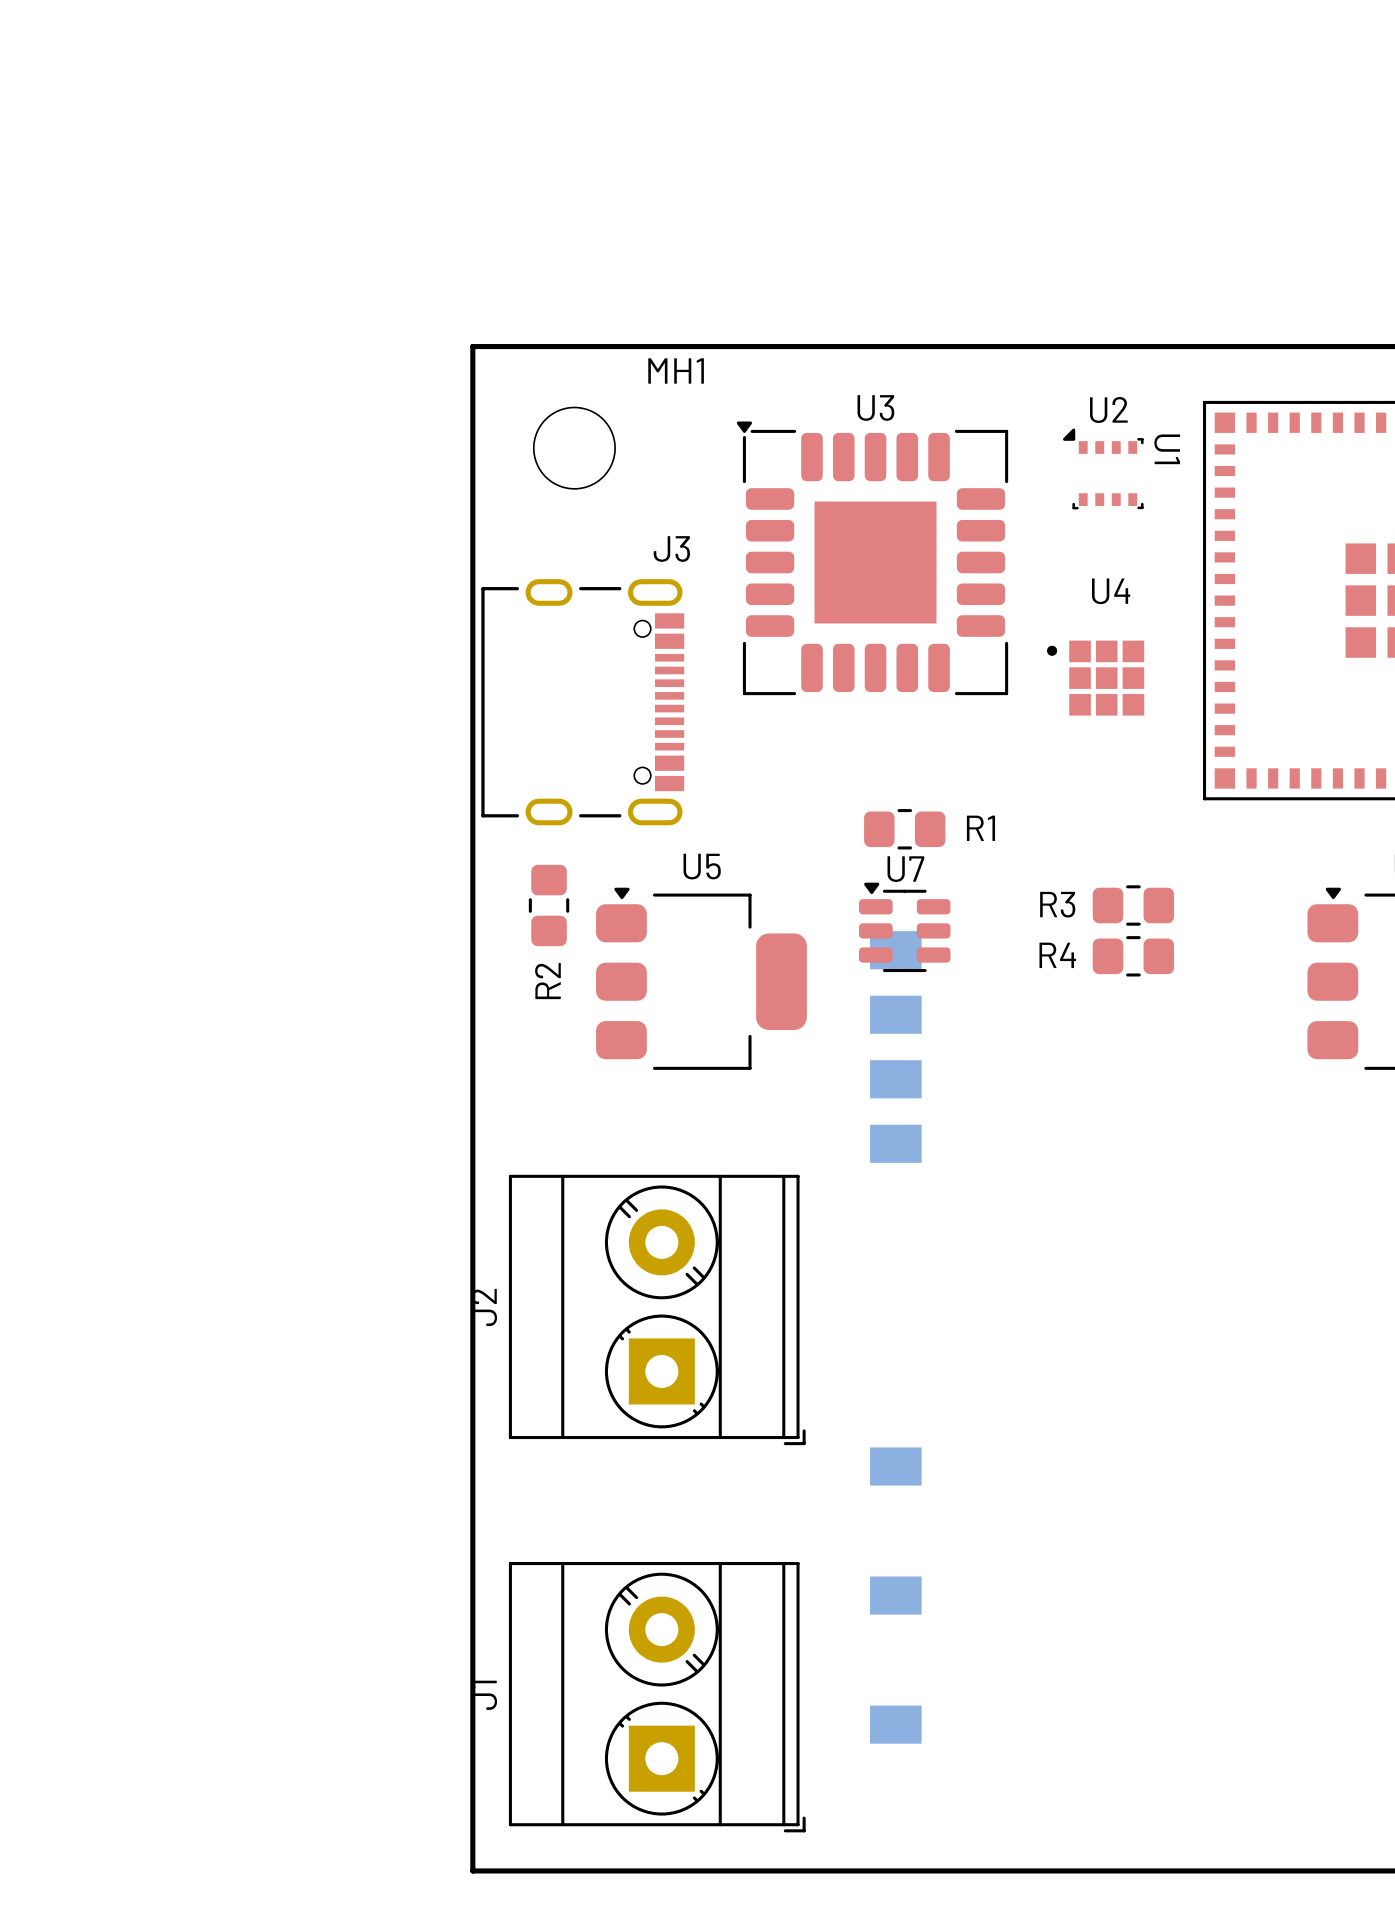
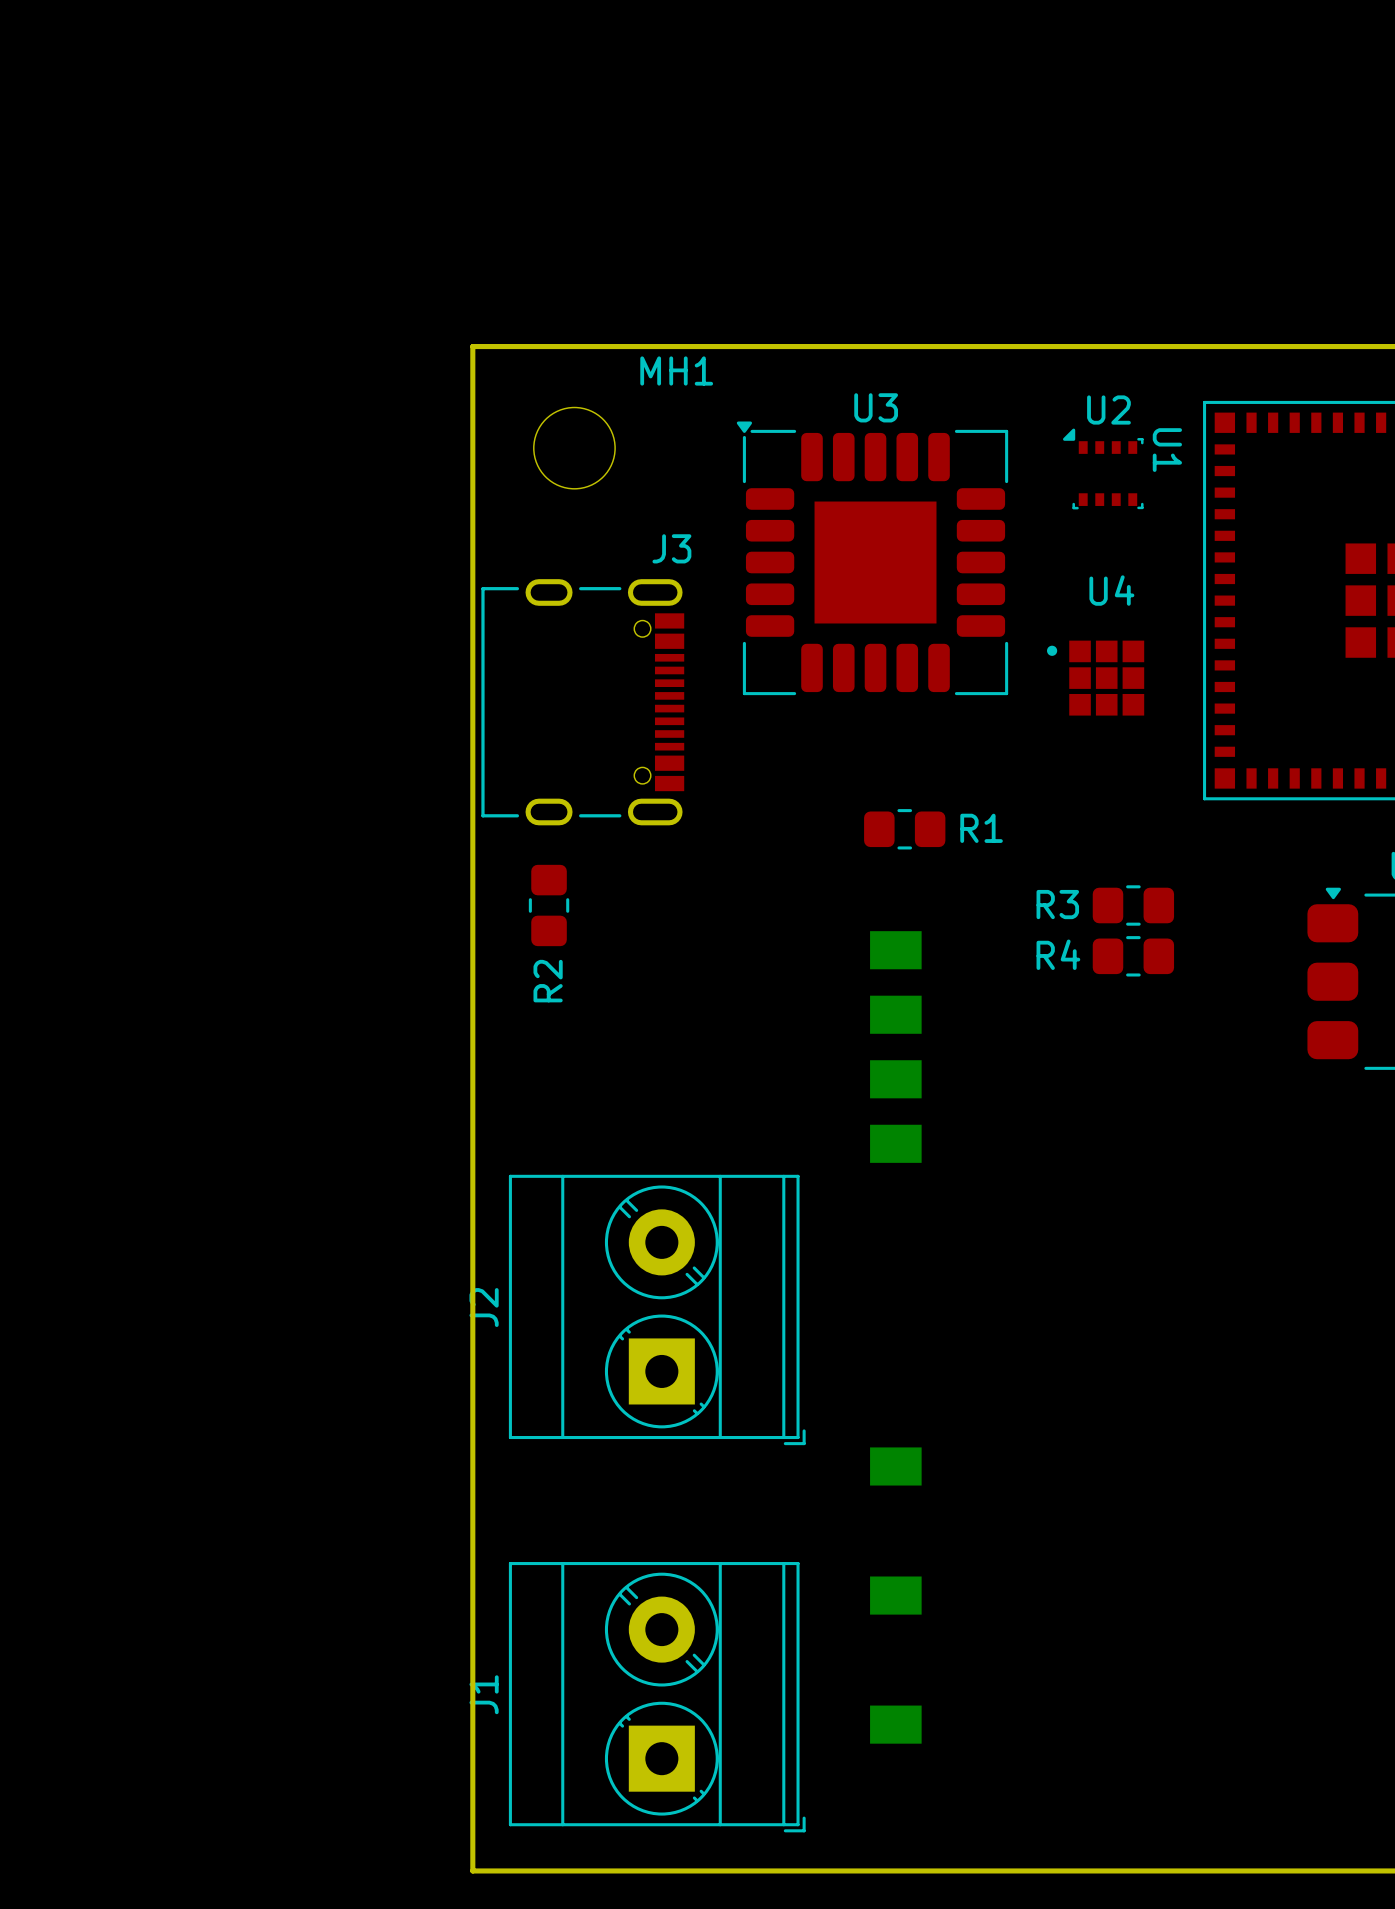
U7: (904, 927) -> none
U5: (701, 978) -> none

